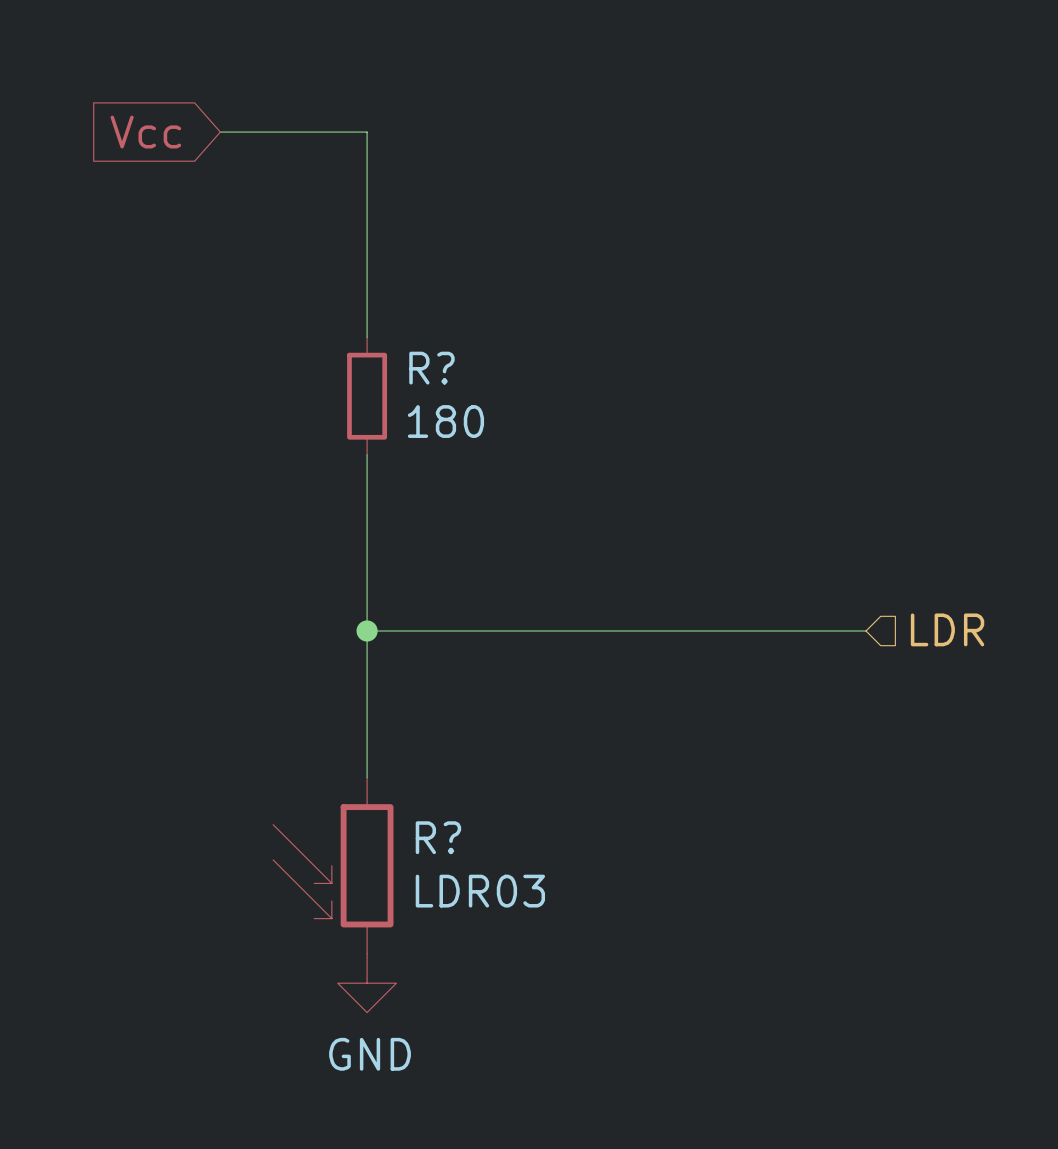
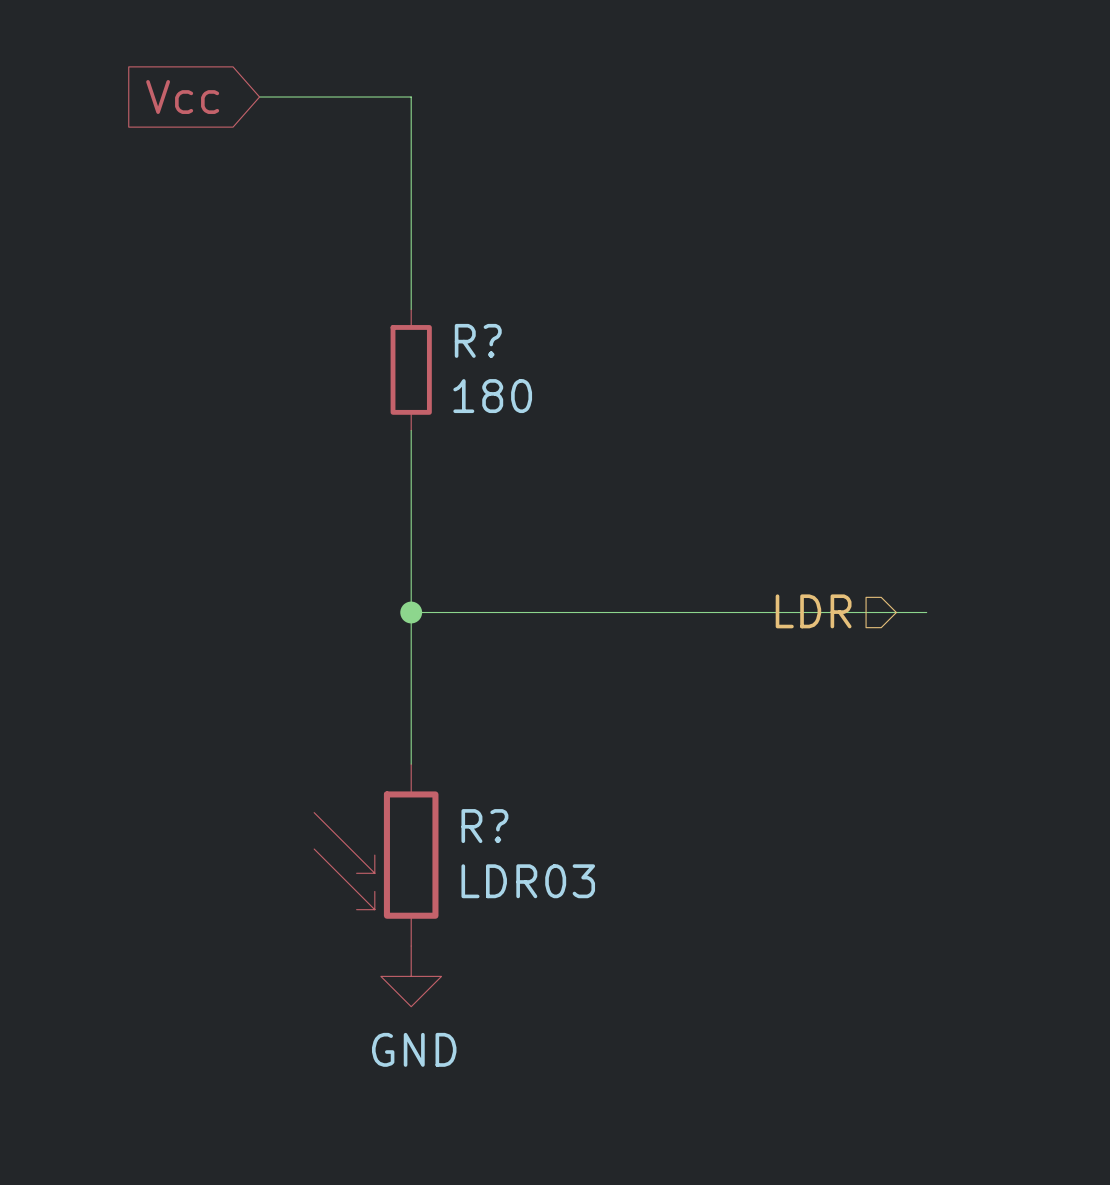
hierarchical label rotation: 0° (947, 629) -> 180° (813, 611)
hierarchical label position: LDR (947, 629) -> LDR (813, 611)

